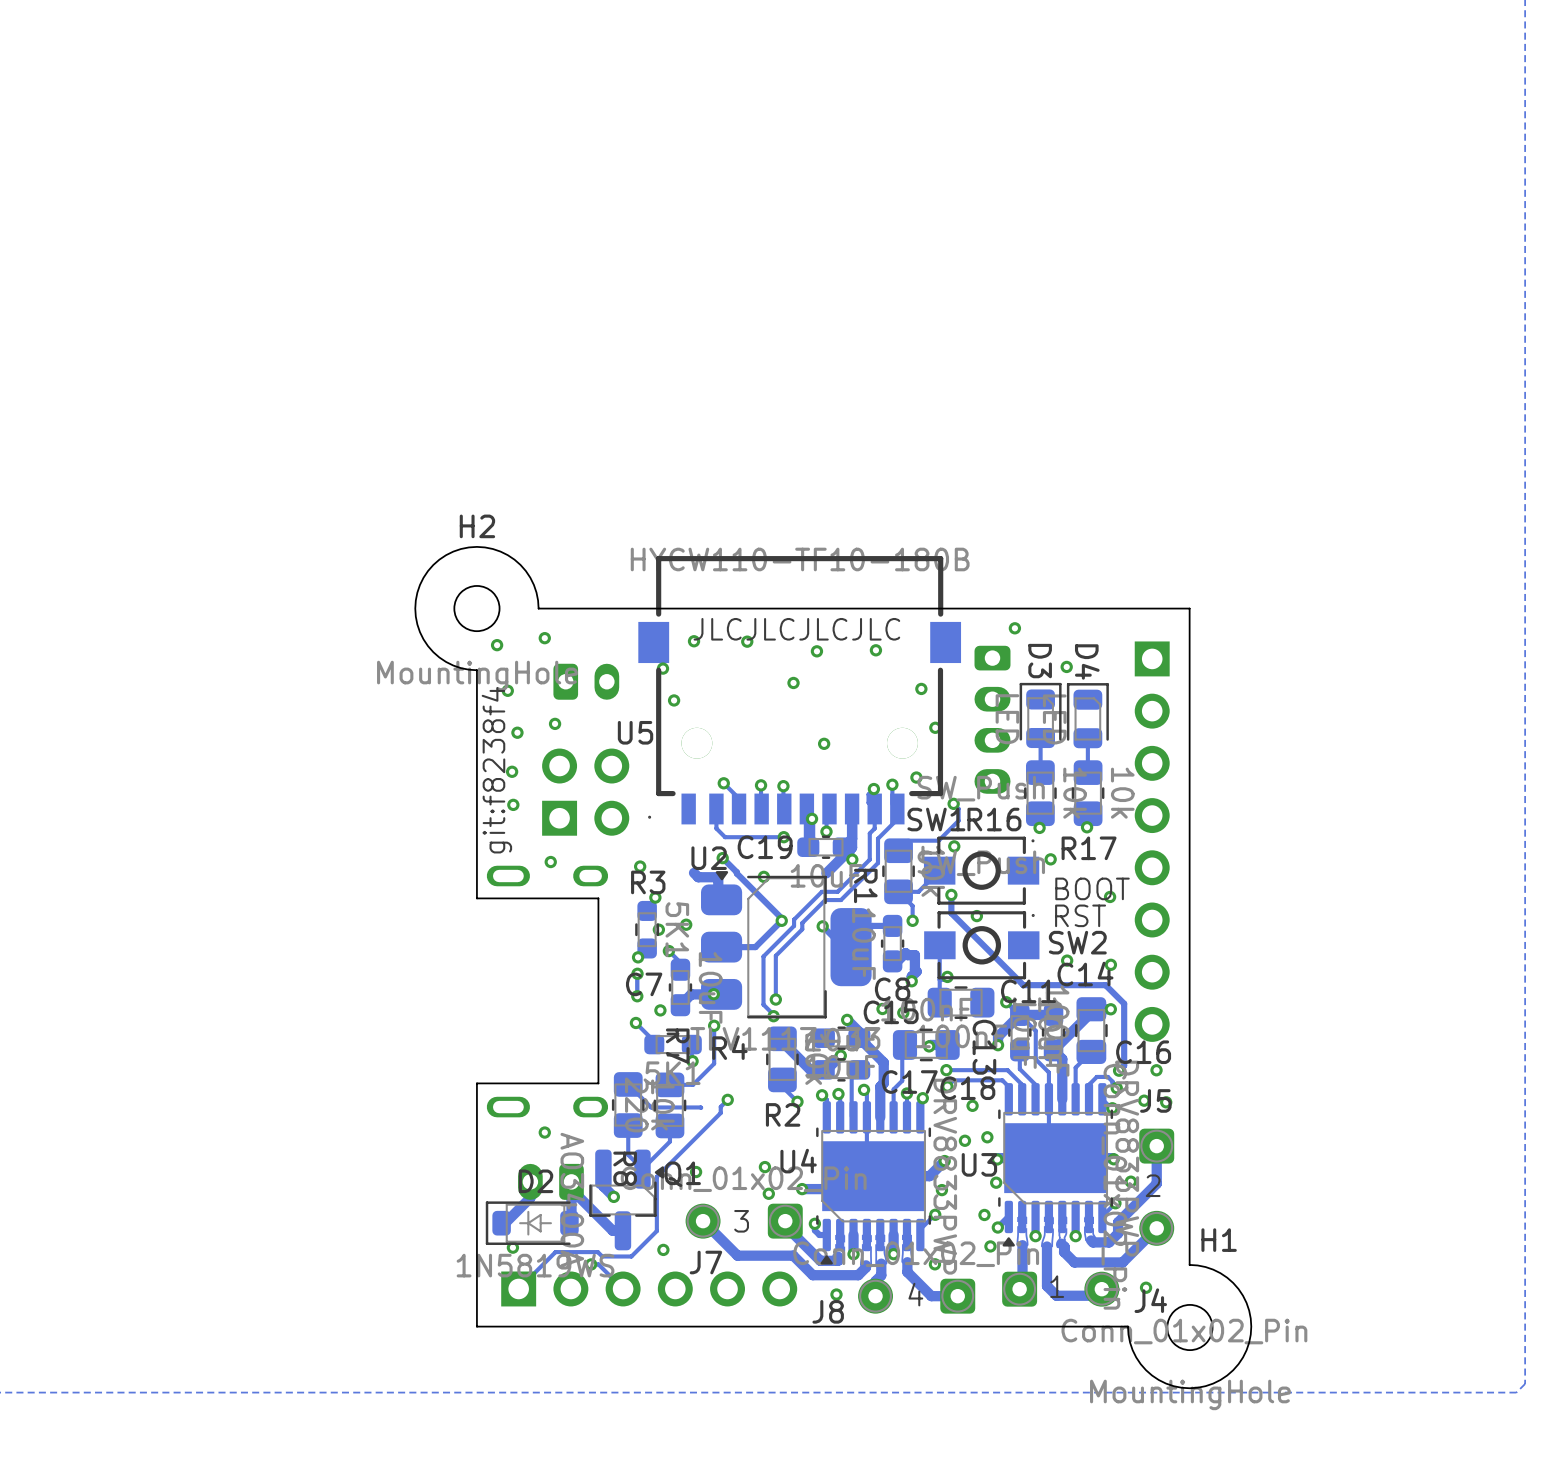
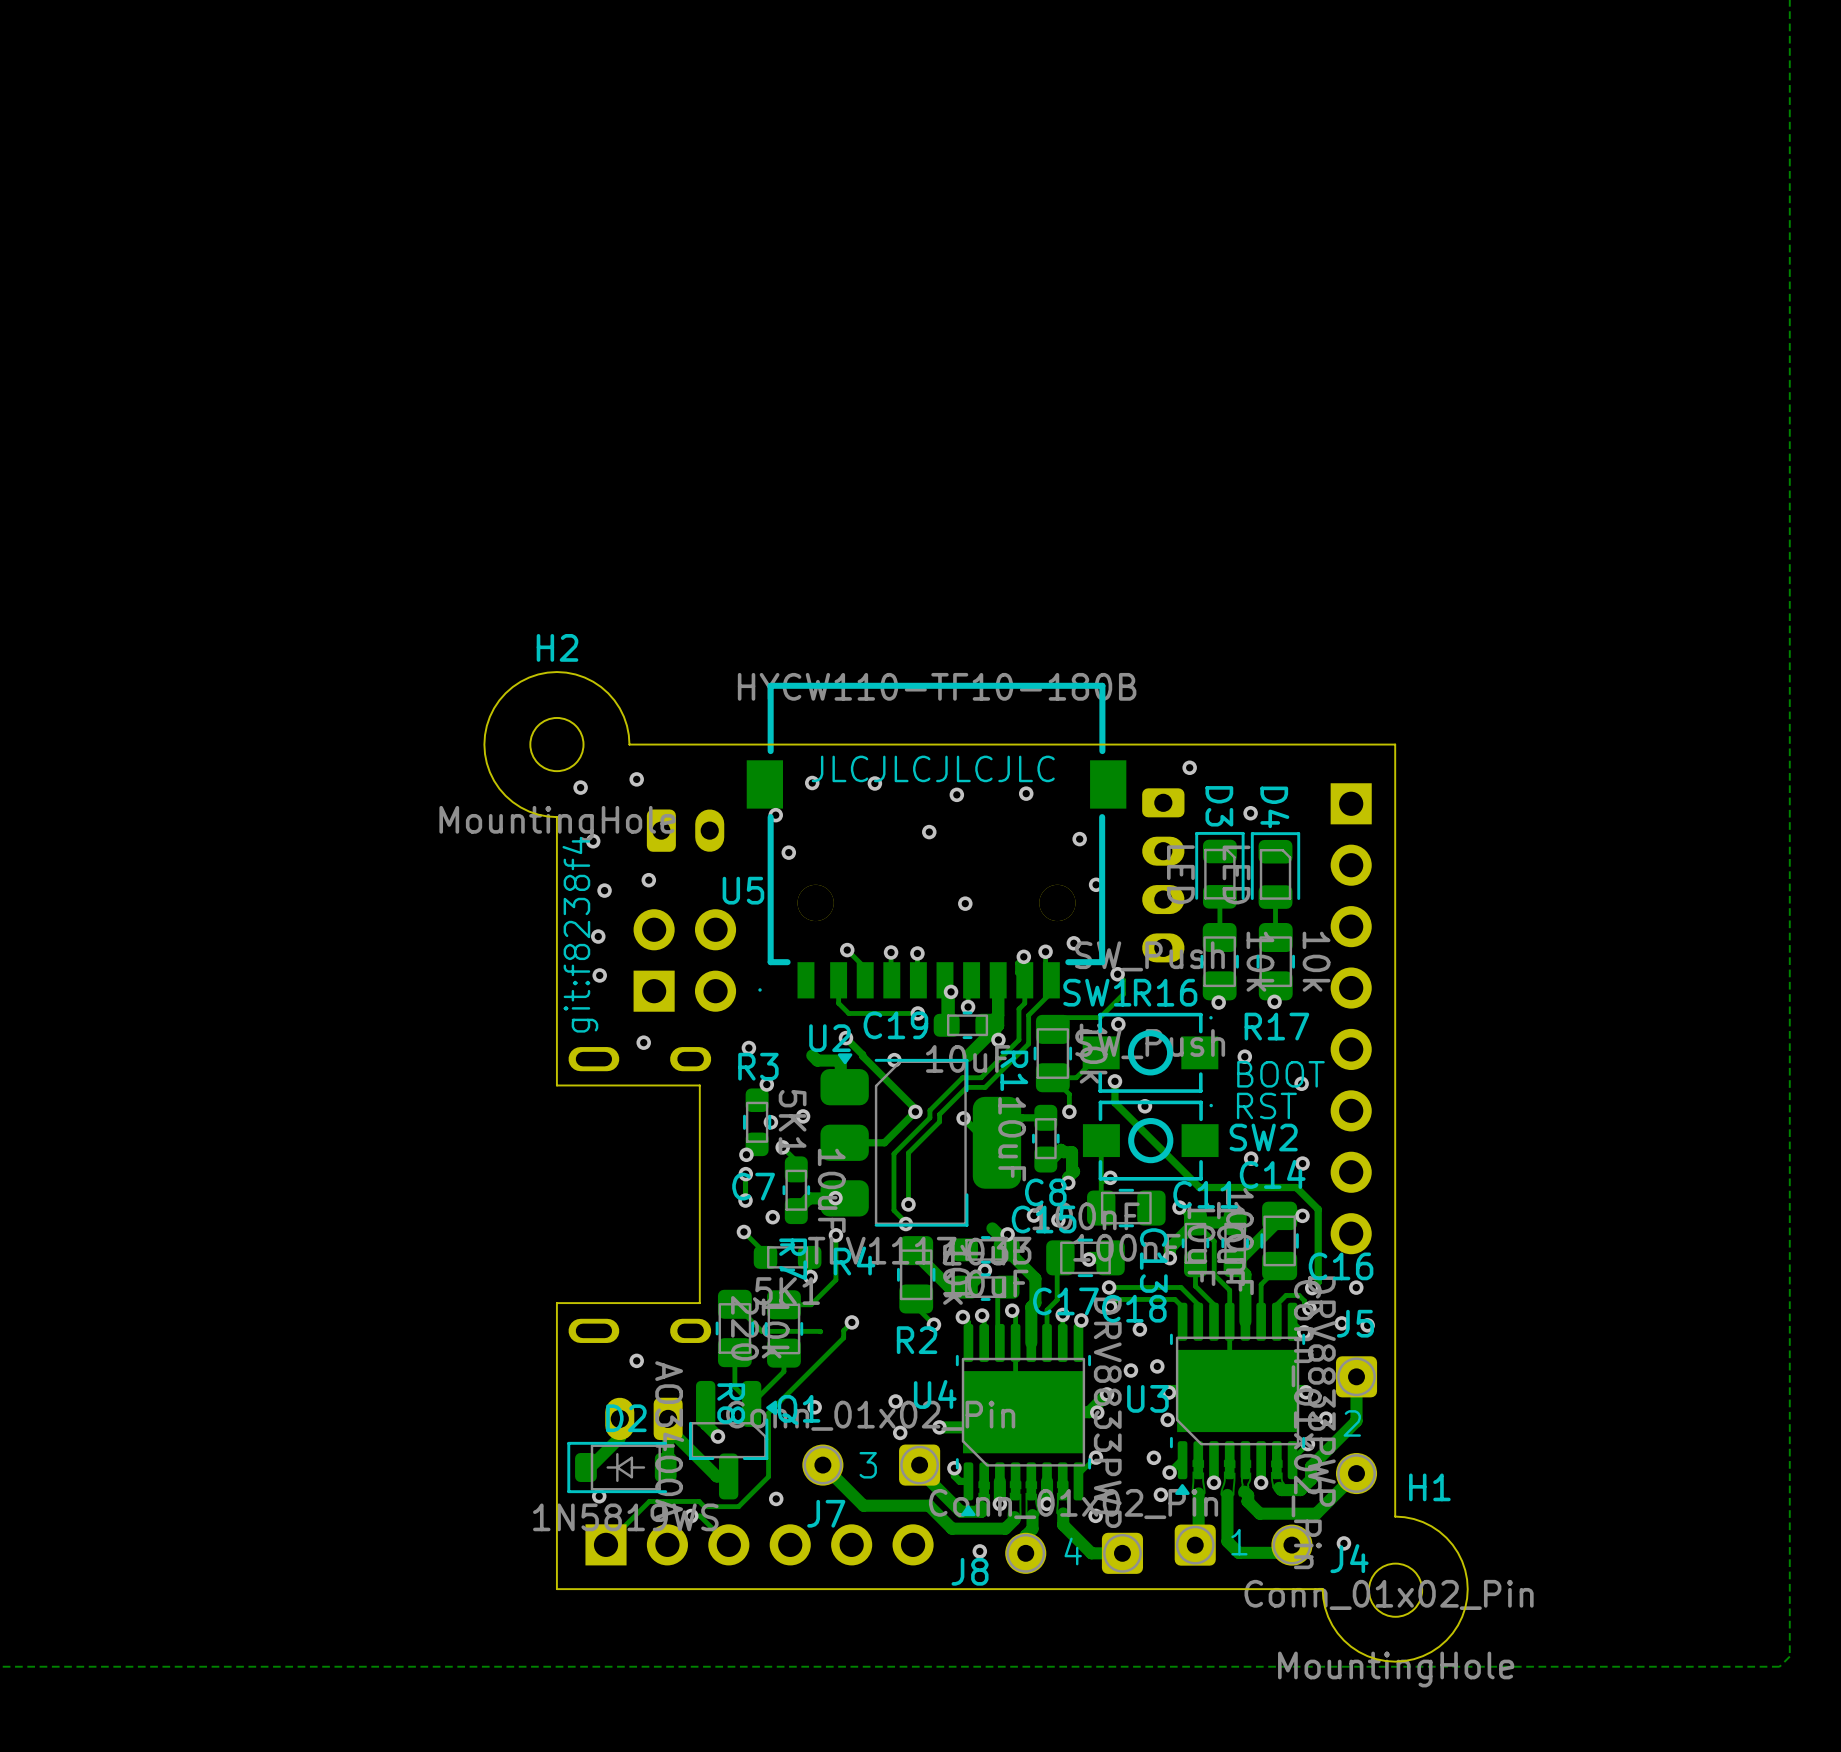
via position: (1050, 859) -> (1244, 1056)
via position: (847, 1019) -> (1007, 1234)
via position: (941, 1190) -> (1097, 1412)

